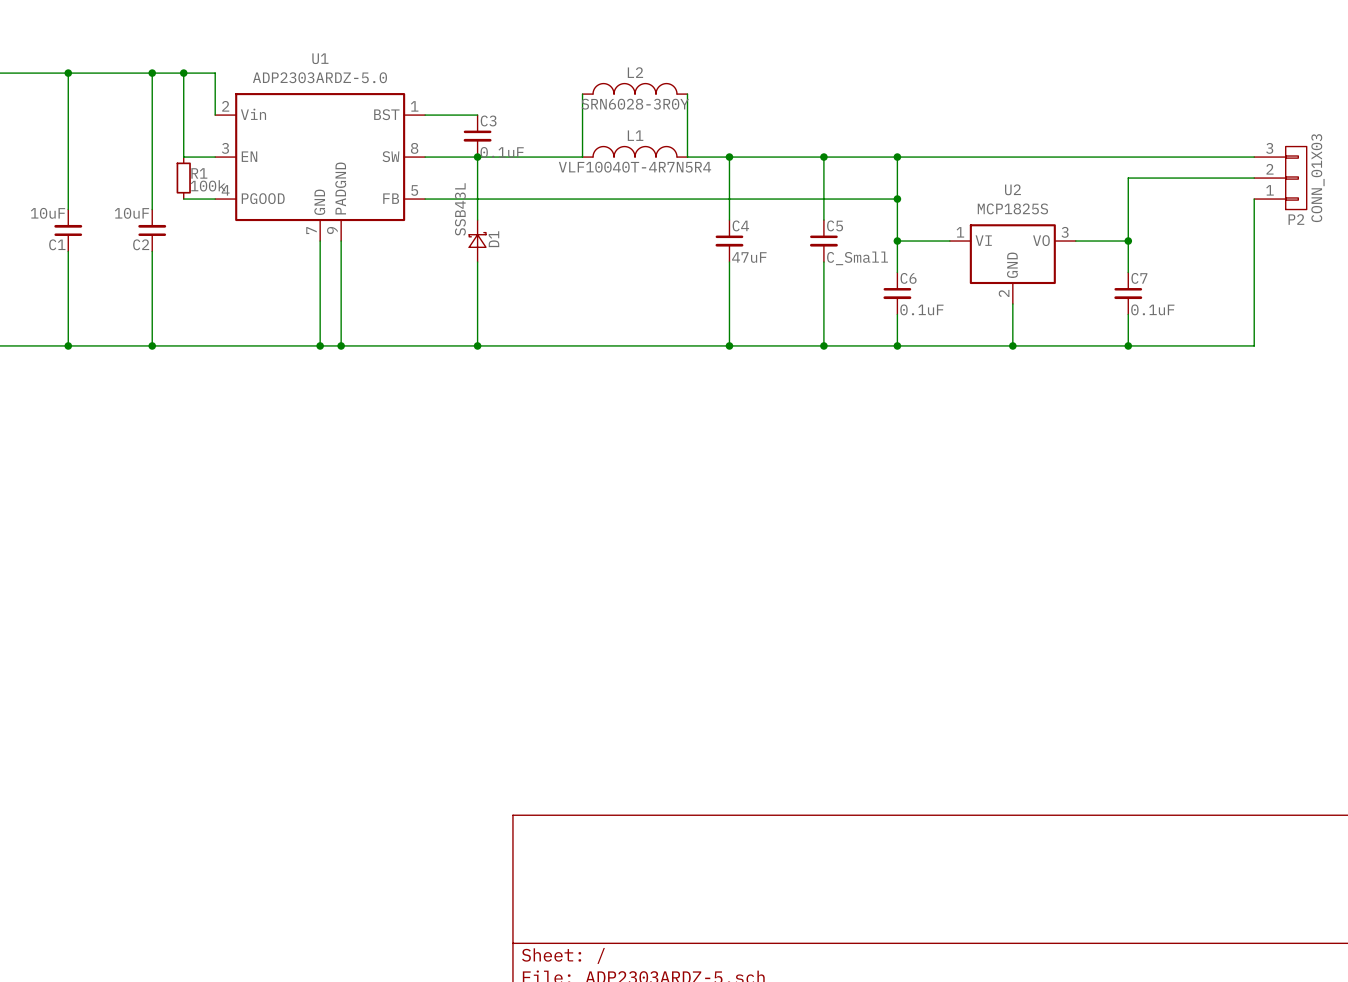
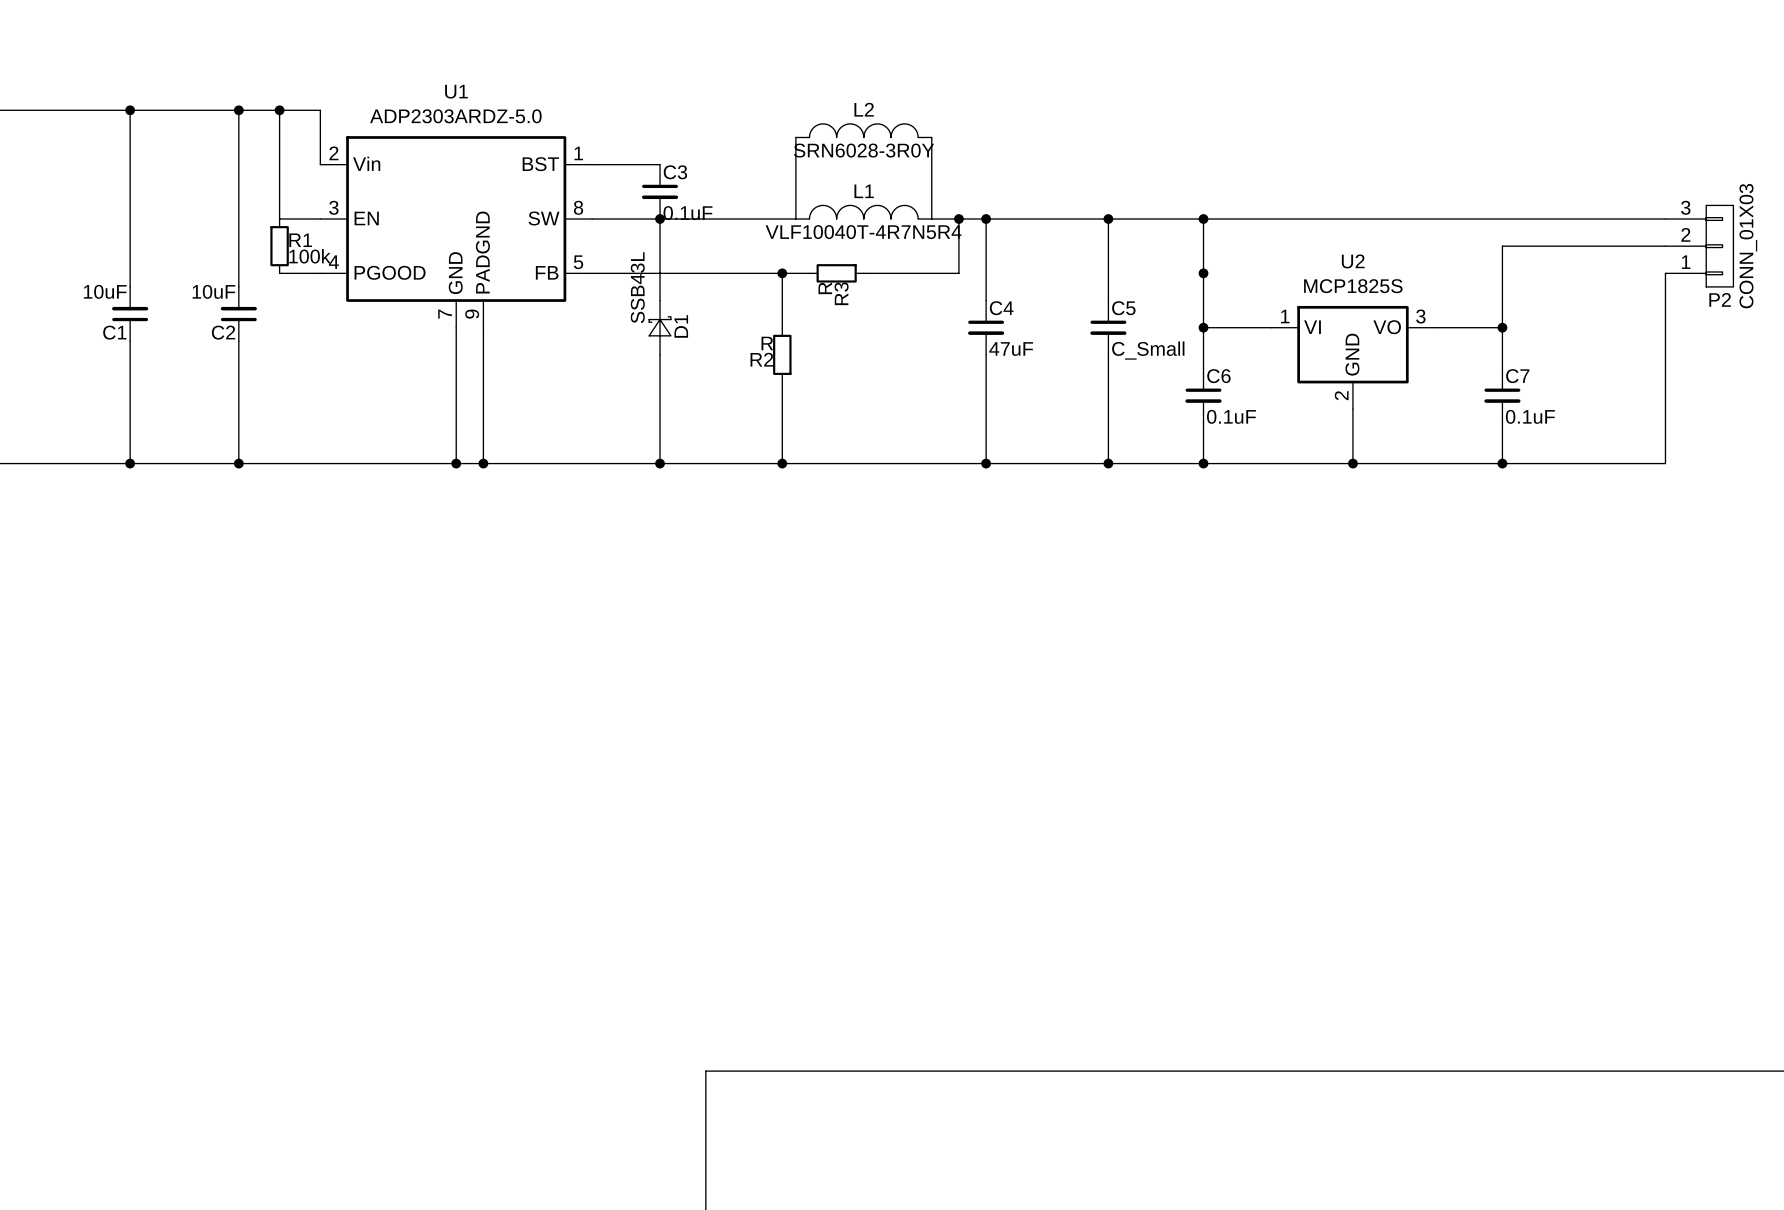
junction: none -> (958, 219)
wire: none -> (782, 273) (782, 327)
junction: none -> (782, 273)
wire: (593, 199) (635, 199) -> none
R3: none -> R (836, 273)
wire: (708, 199) (897, 199) -> (958, 273) (958, 219)
R2: none -> R (782, 354)
wire: none -> (782, 382) (782, 463)
junction: none -> (782, 463)

